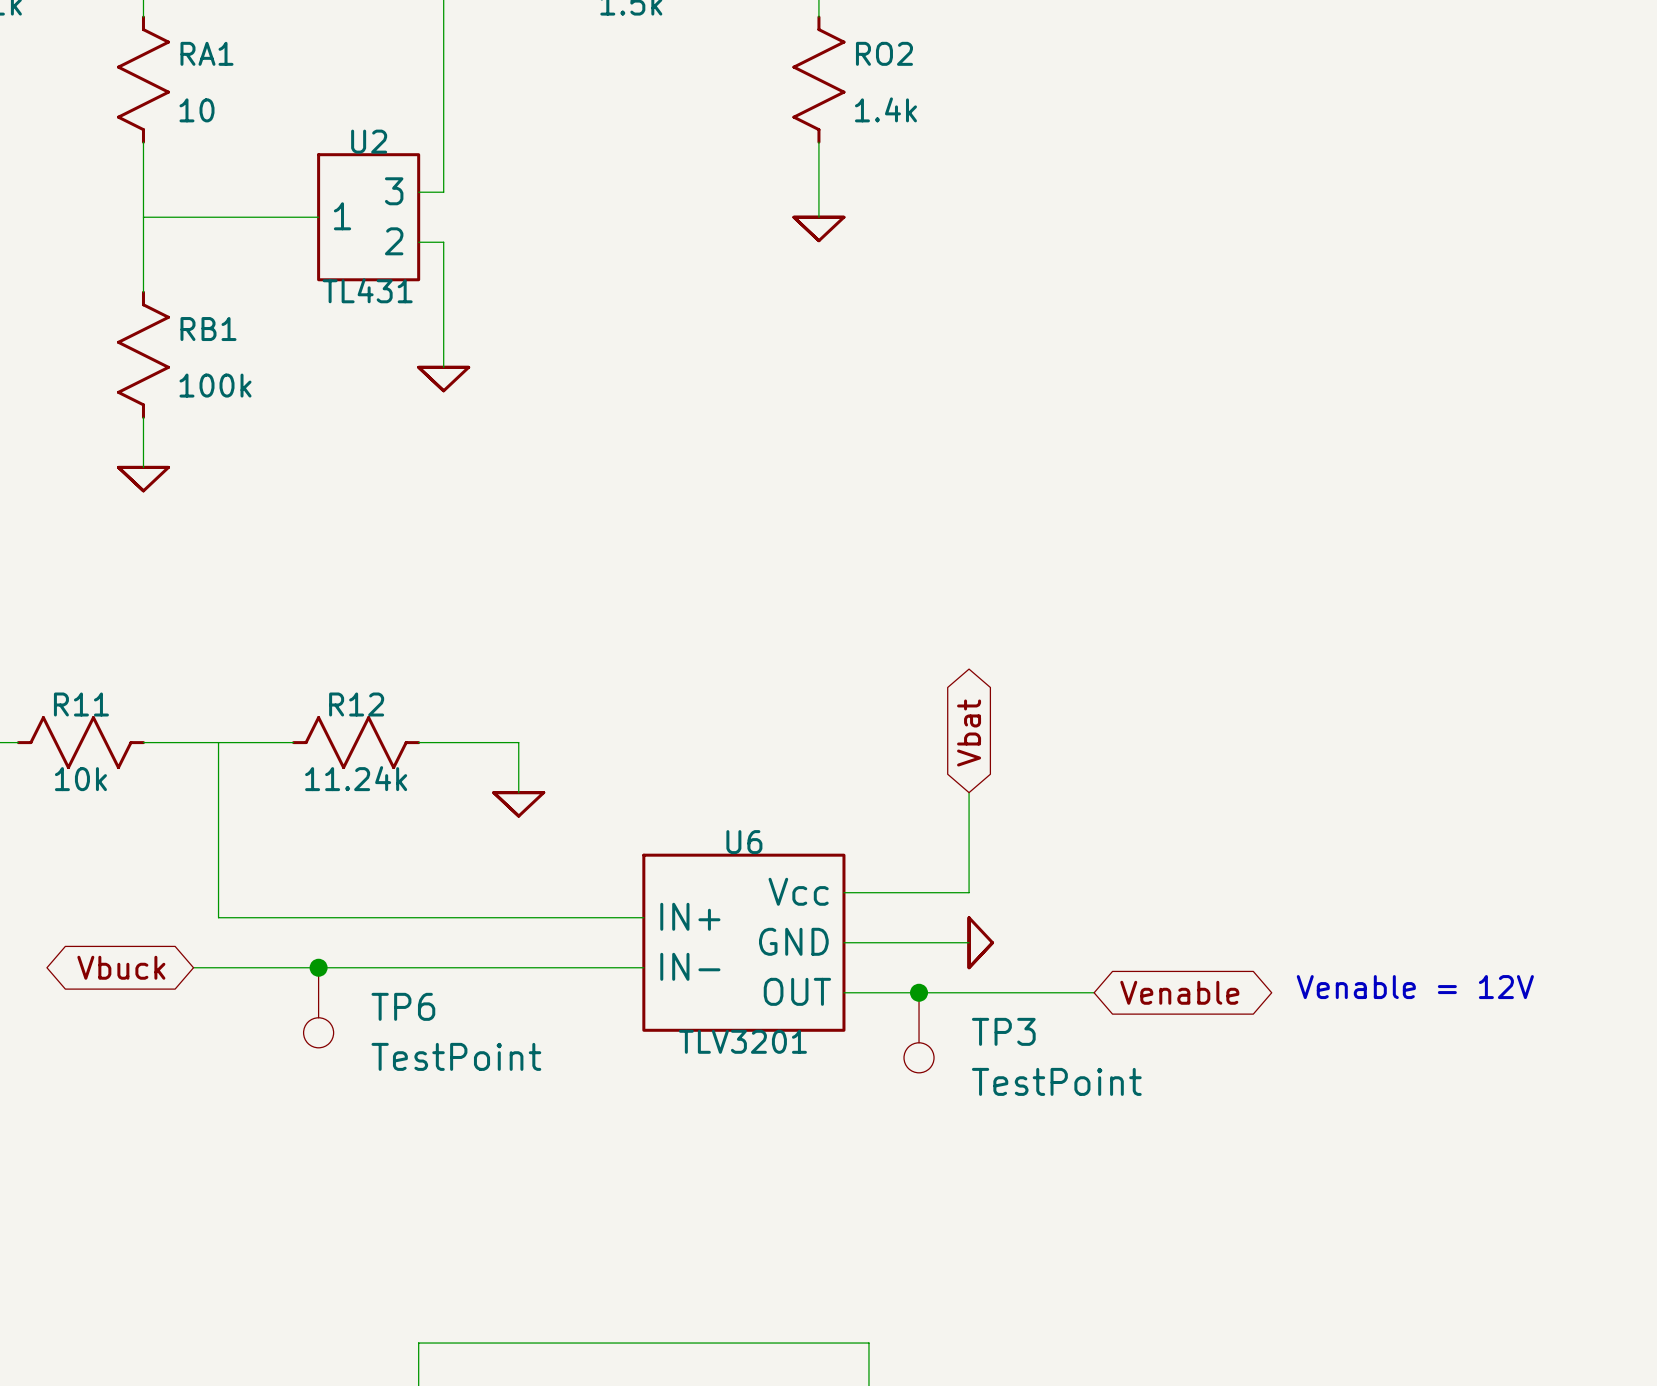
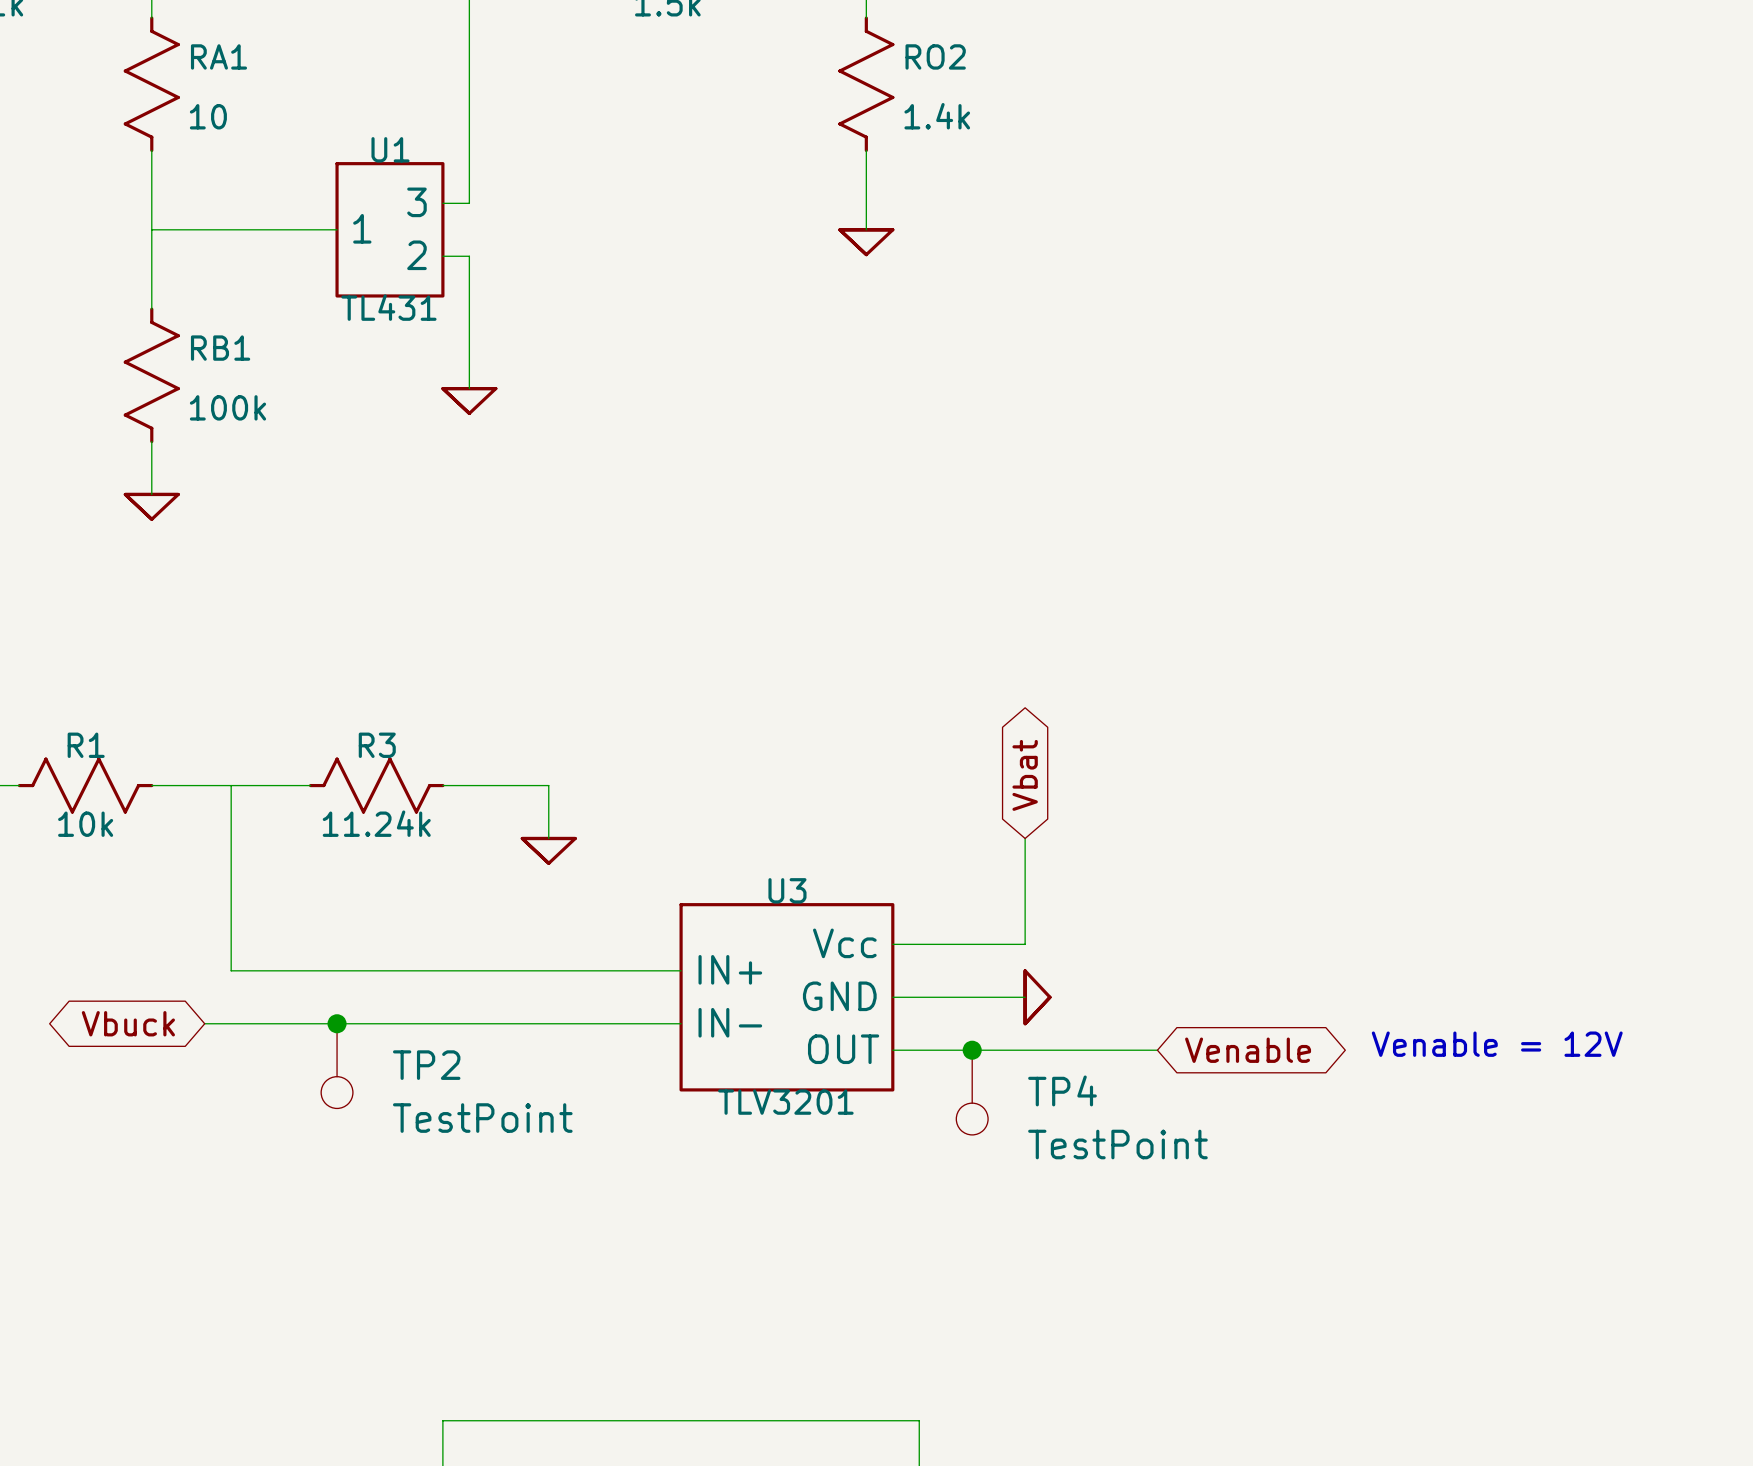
U2 name: U2 (369, 141) -> U1 (390, 149)
R11 name: R11 (81, 704) -> R1 (86, 745)
R12 name: R12 (356, 704) -> R3 (377, 745)
U6 name: U6 (744, 842) -> U3 (787, 890)
TP6 name: TP6 (403, 1006) -> TP2 (426, 1065)
TP3 name: TP3 (1003, 1031) -> TP4 (1062, 1090)

